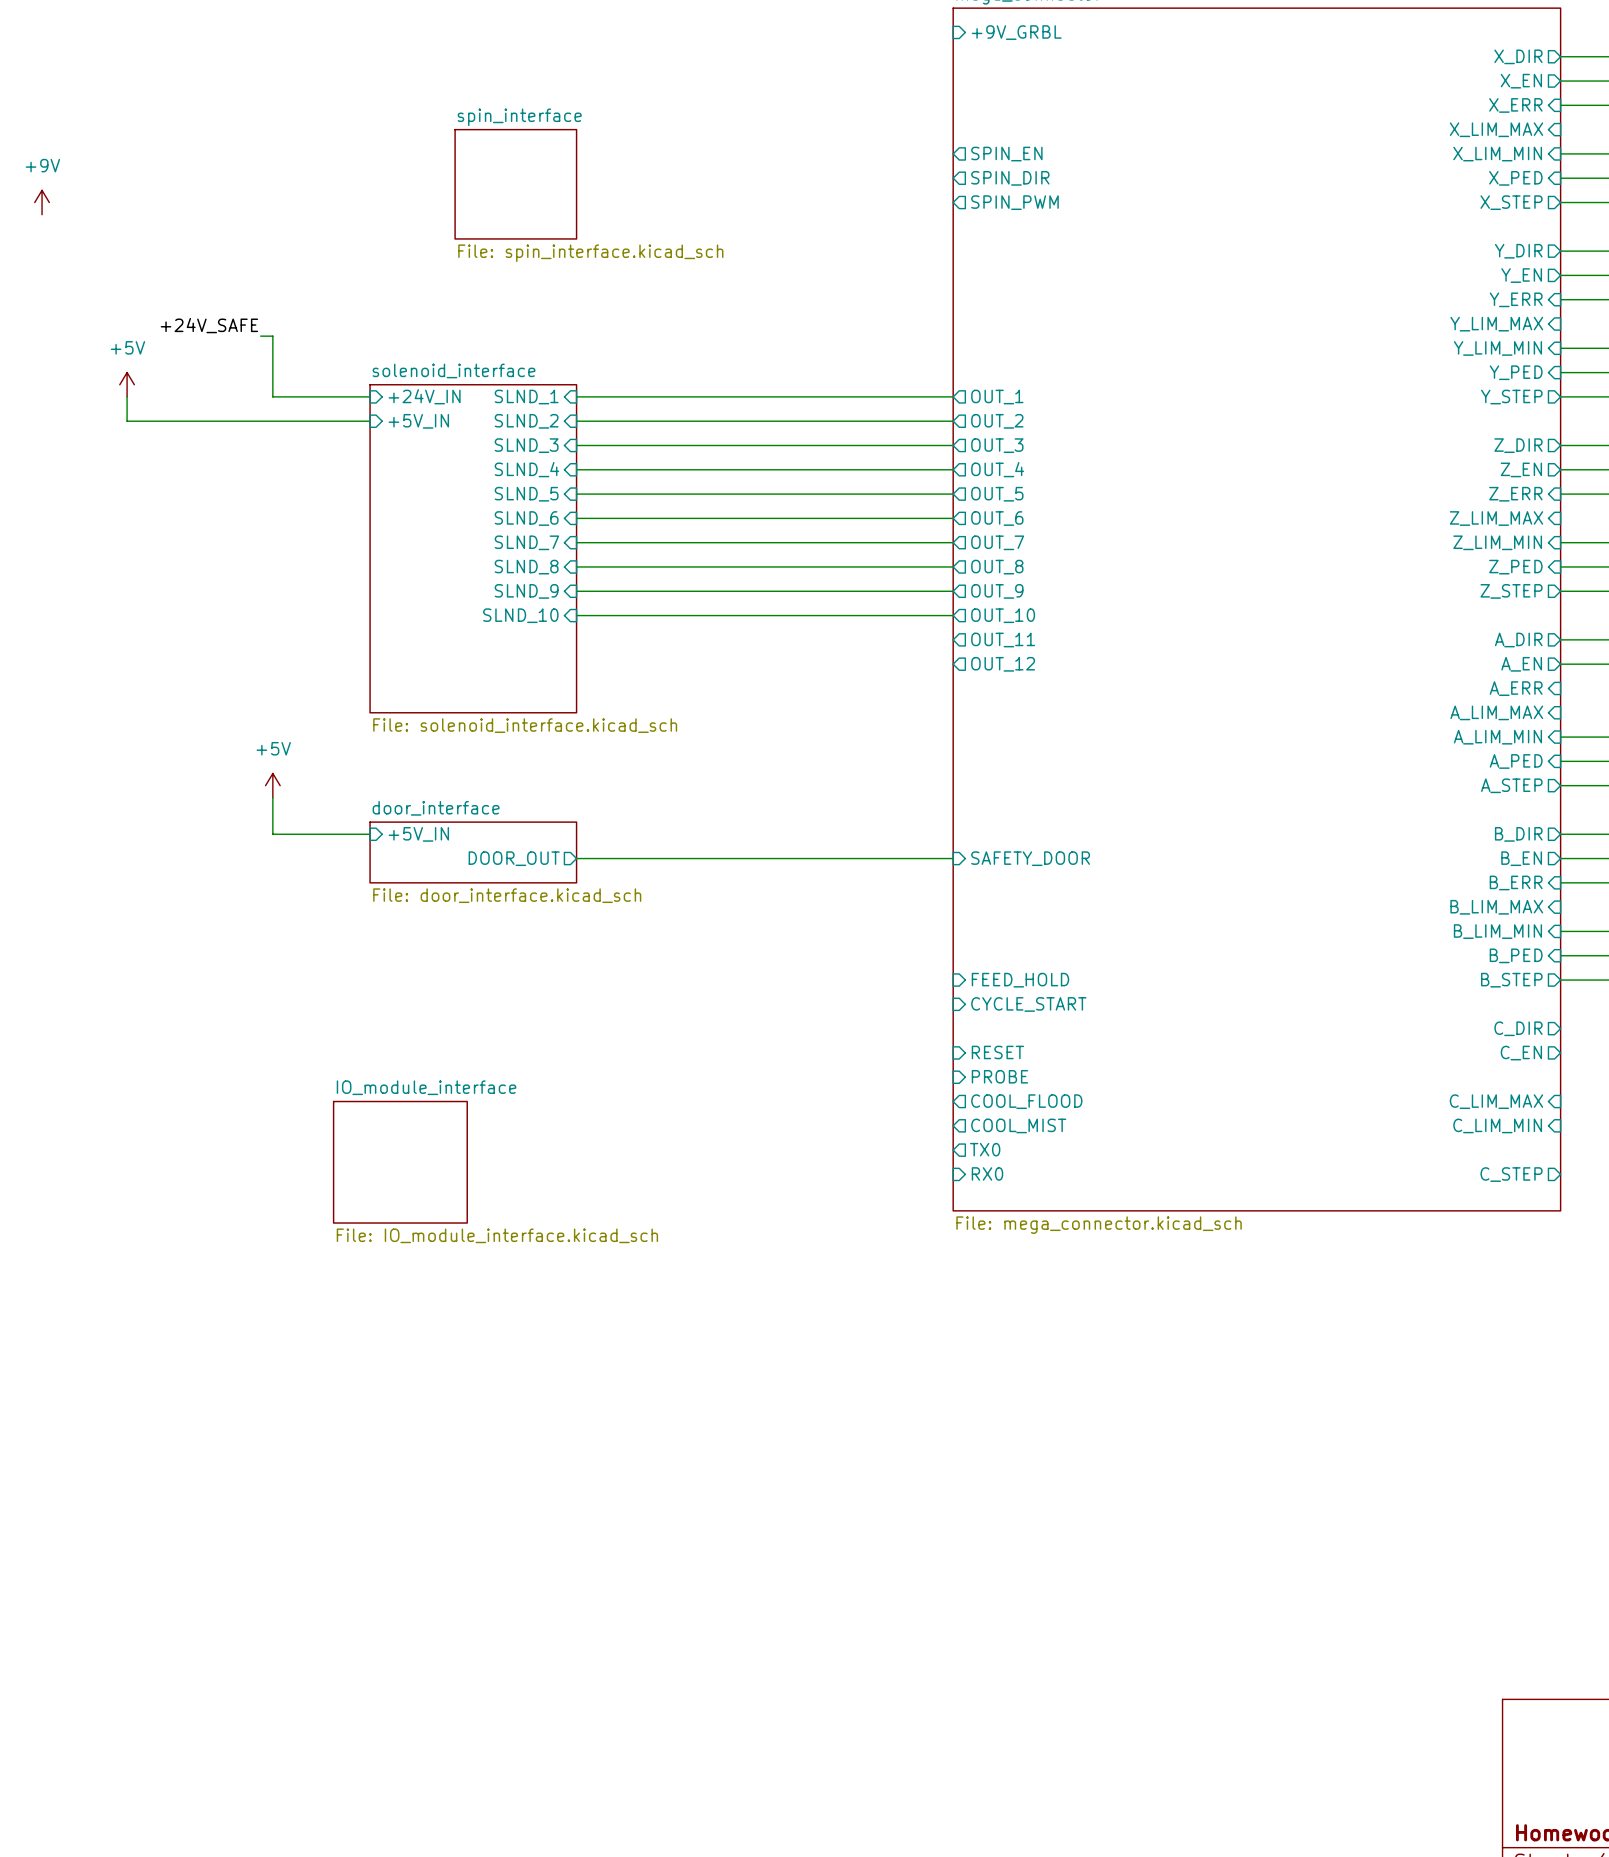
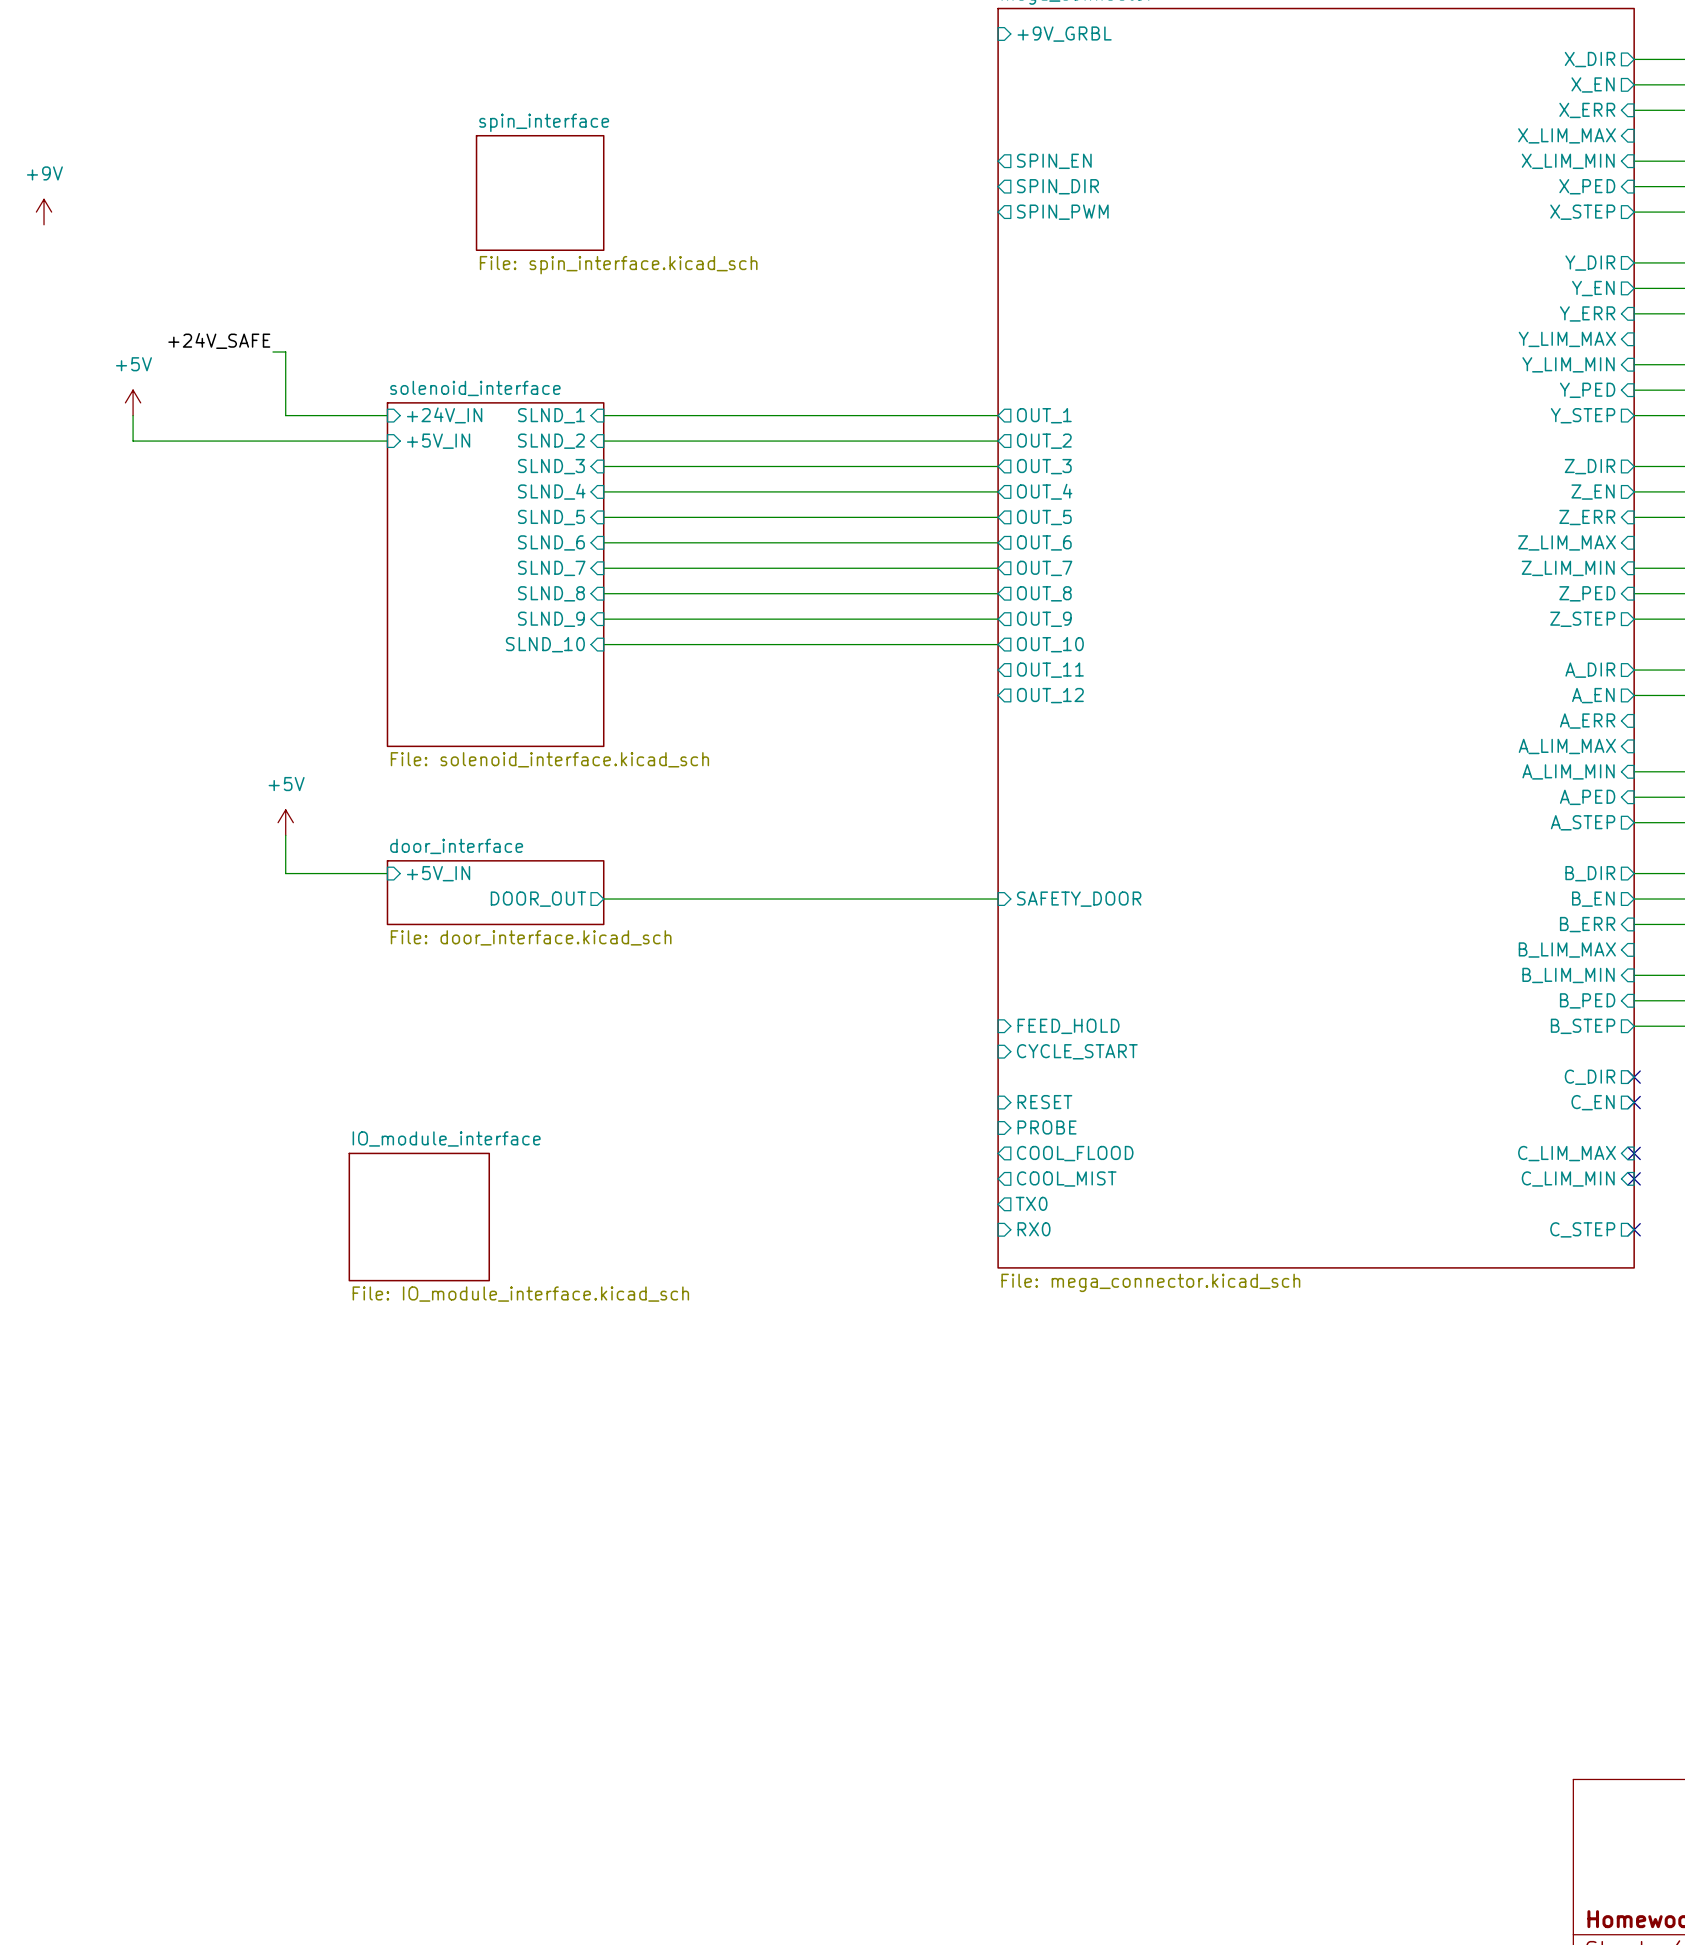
no-connect mark: none -> (1634, 1077)
no-connect mark: none -> (1634, 1102)
no-connect mark: none -> (1634, 1153)
no-connect mark: none -> (1634, 1178)
no-connect mark: none -> (1634, 1229)

